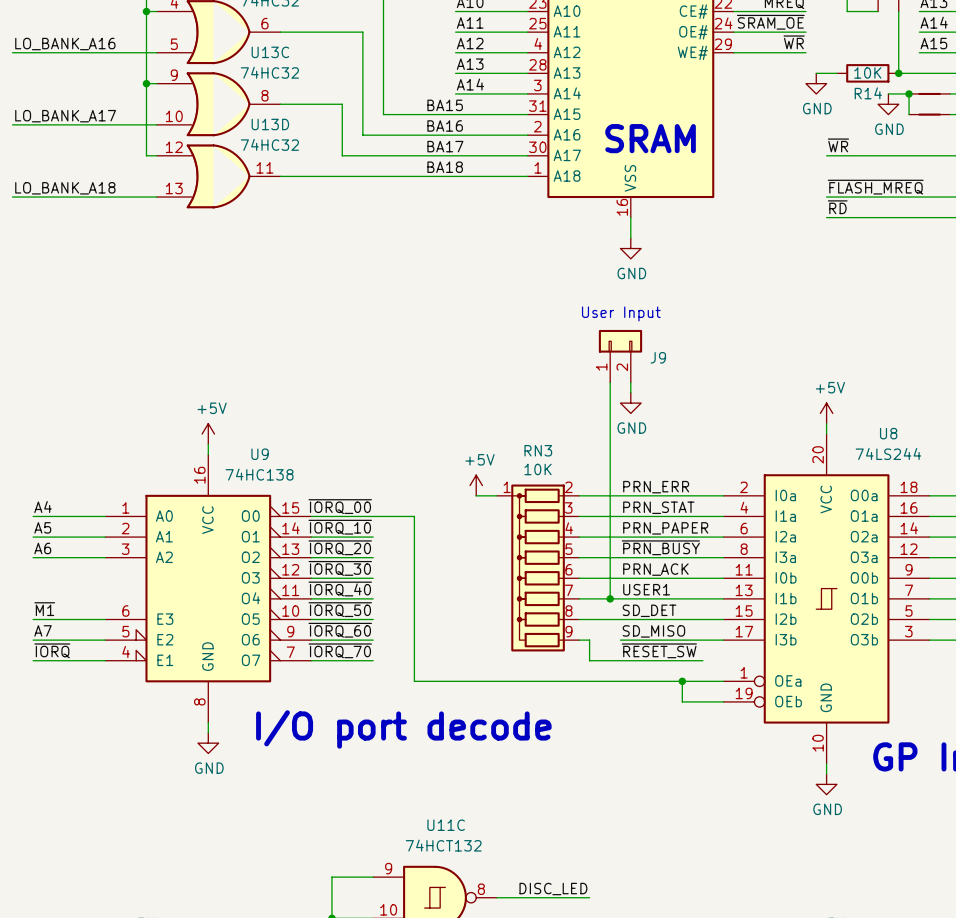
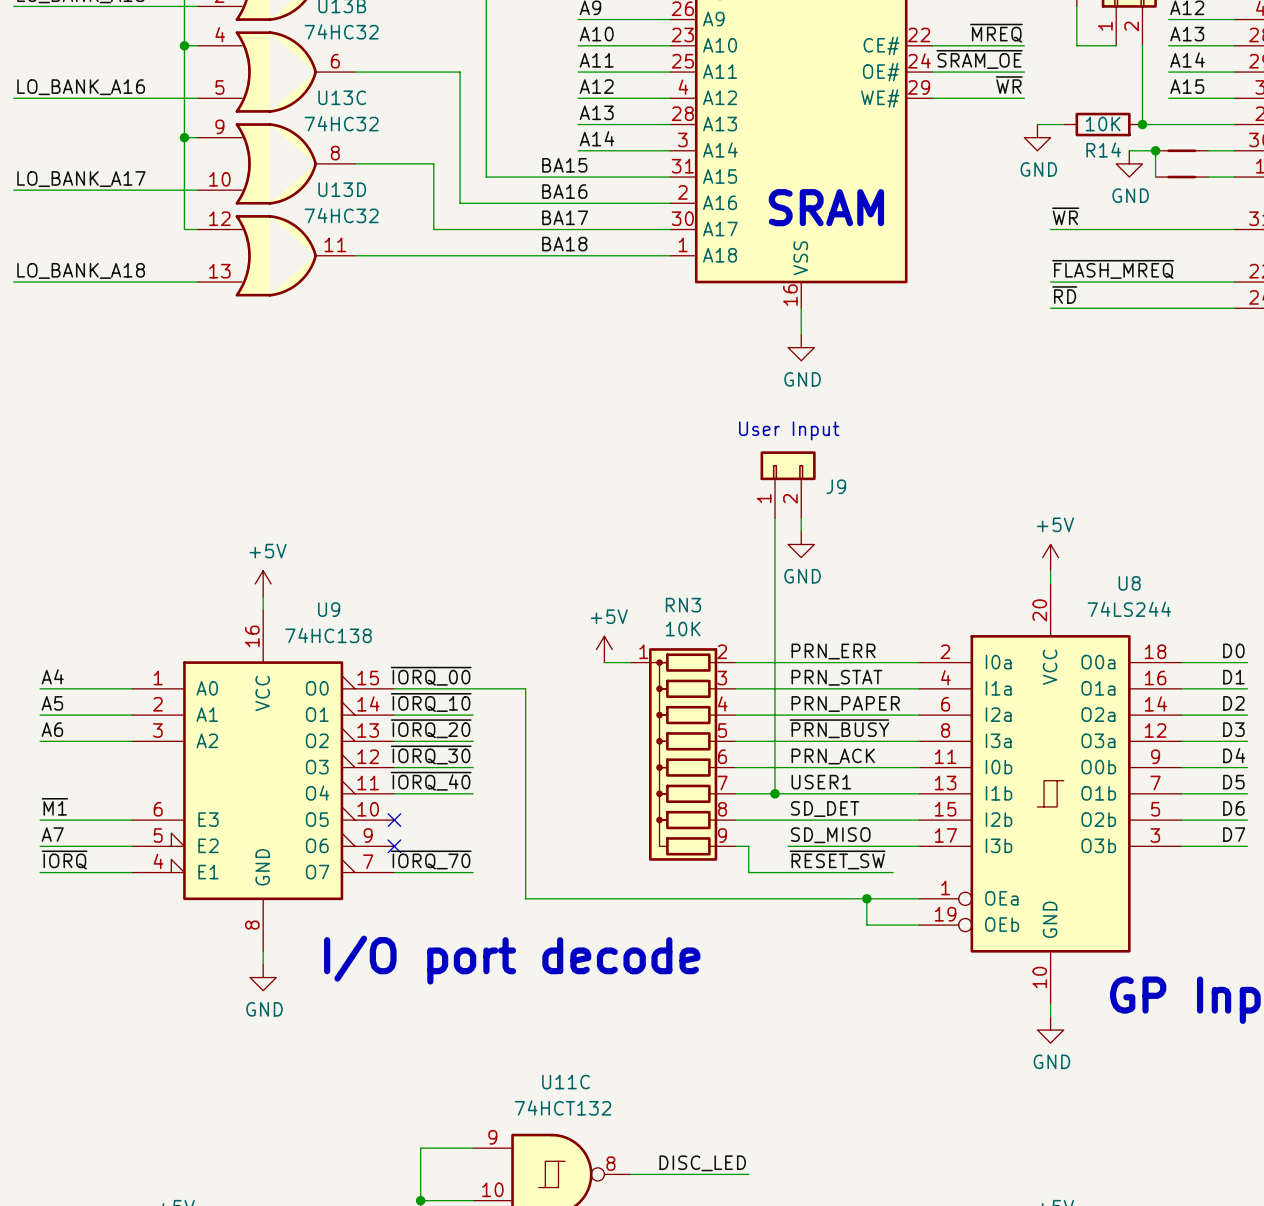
label: ~{IORQ_50} (340, 609) -> none
wire: (311, 619) (373, 619) -> none
no-connect mark: none -> (394, 820)
label: ~{IORQ_60} (340, 630) -> none
wire: (311, 640) (373, 640) -> none
no-connect mark: none -> (394, 846)

